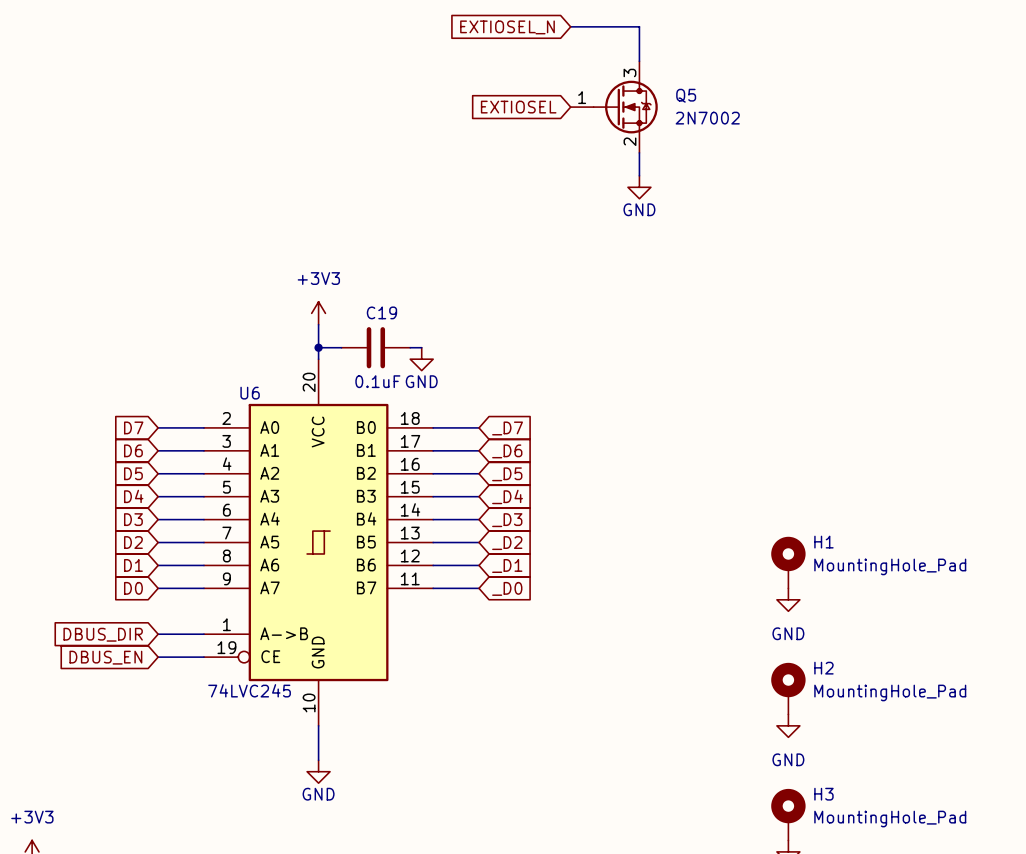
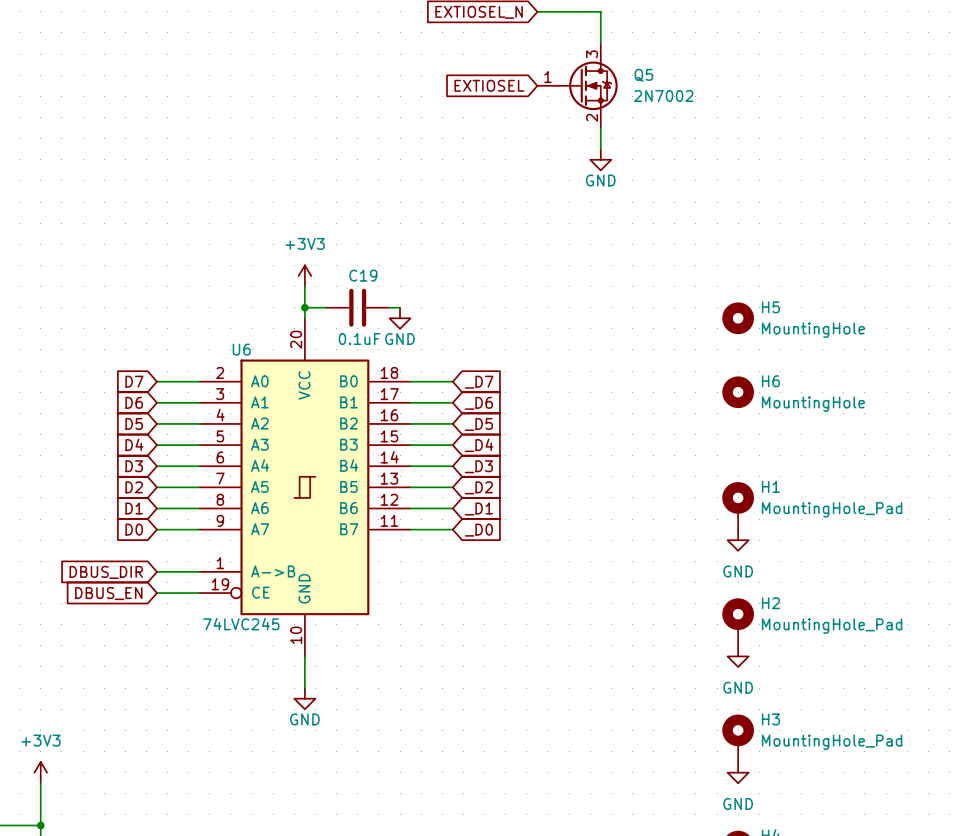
H5: none -> MountingHole (738, 318)
H6: none -> MountingHole (738, 392)

